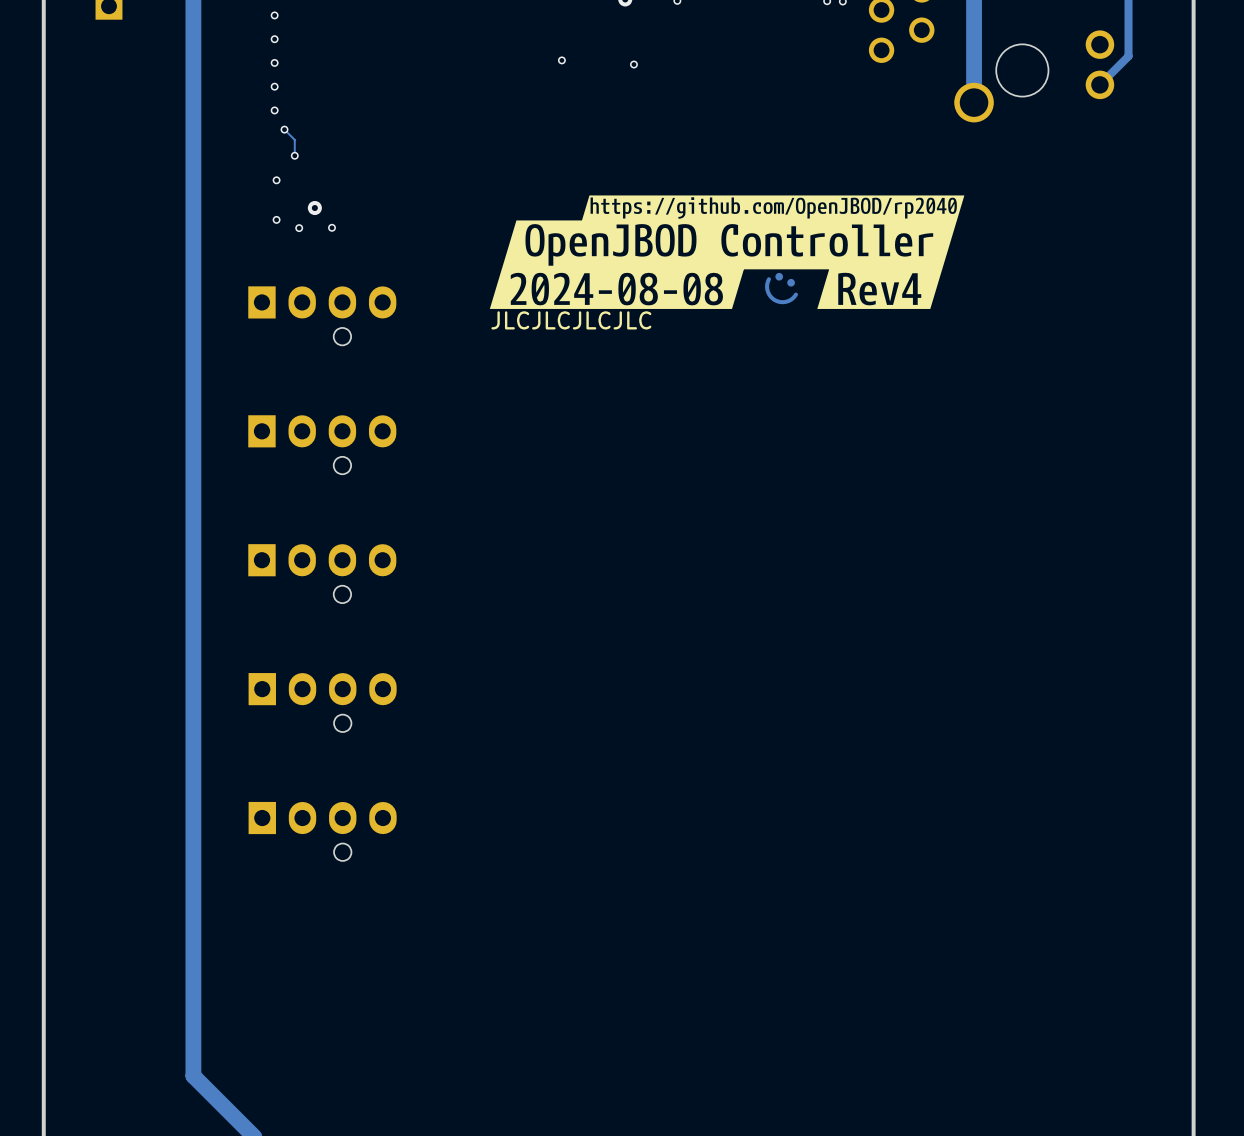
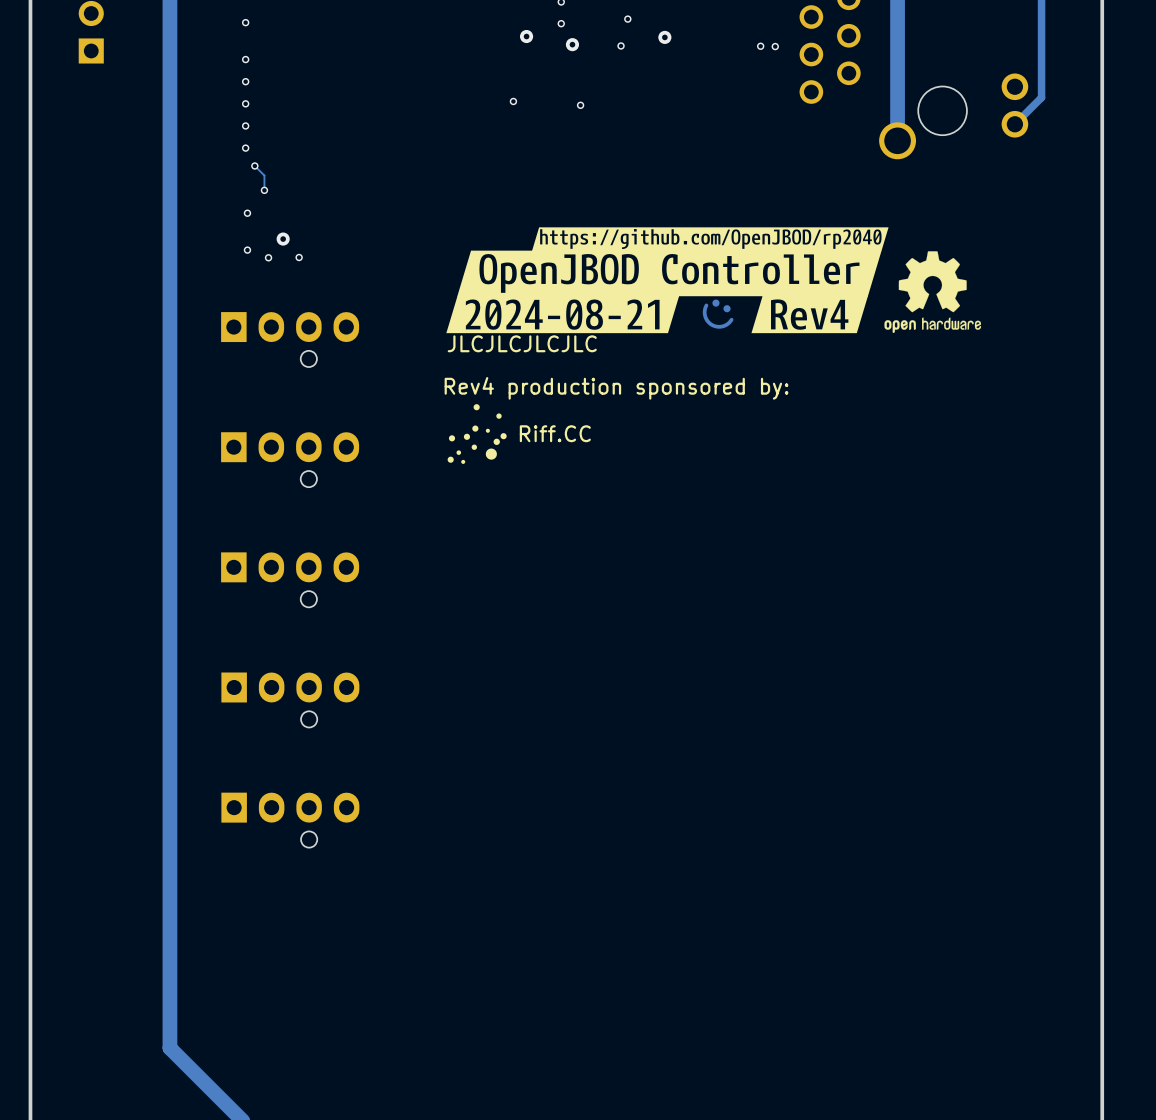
drawing: none -> [884, 251, 982, 334]
drawing shape: [489, 269, 744, 309] -> [446, 296, 680, 334]
text: none -> Rev4 production sponsored by: (616, 388)
drawing: none -> [447, 404, 507, 464]
text: none -> Riff.CC (555, 433)

